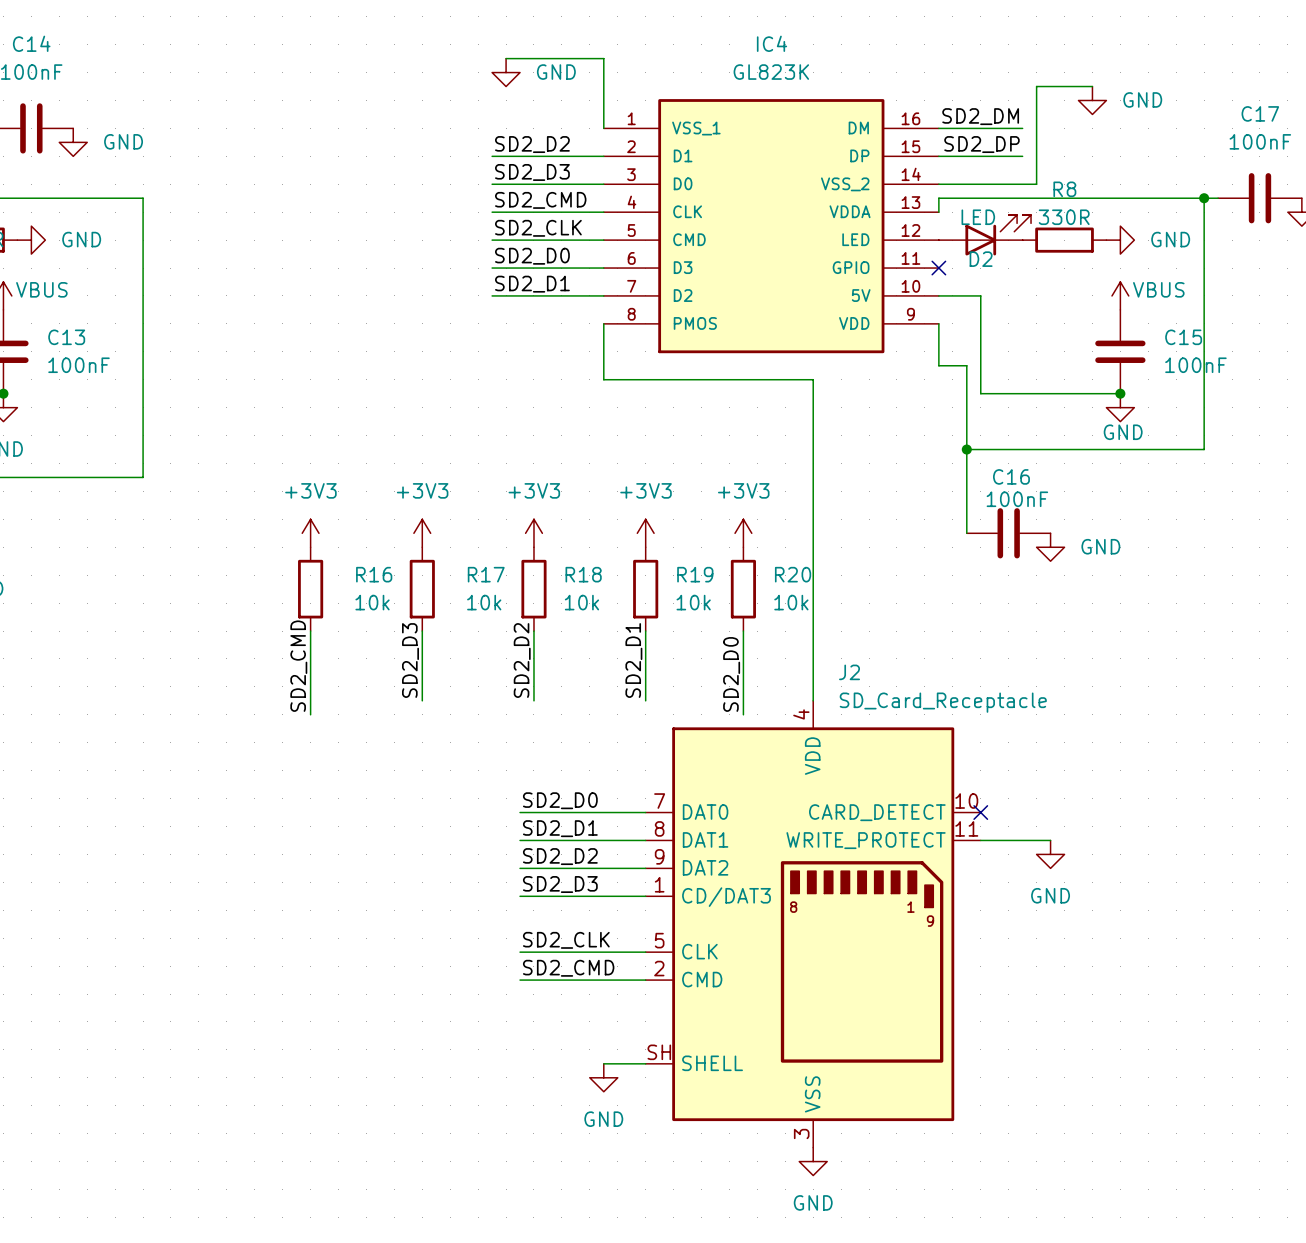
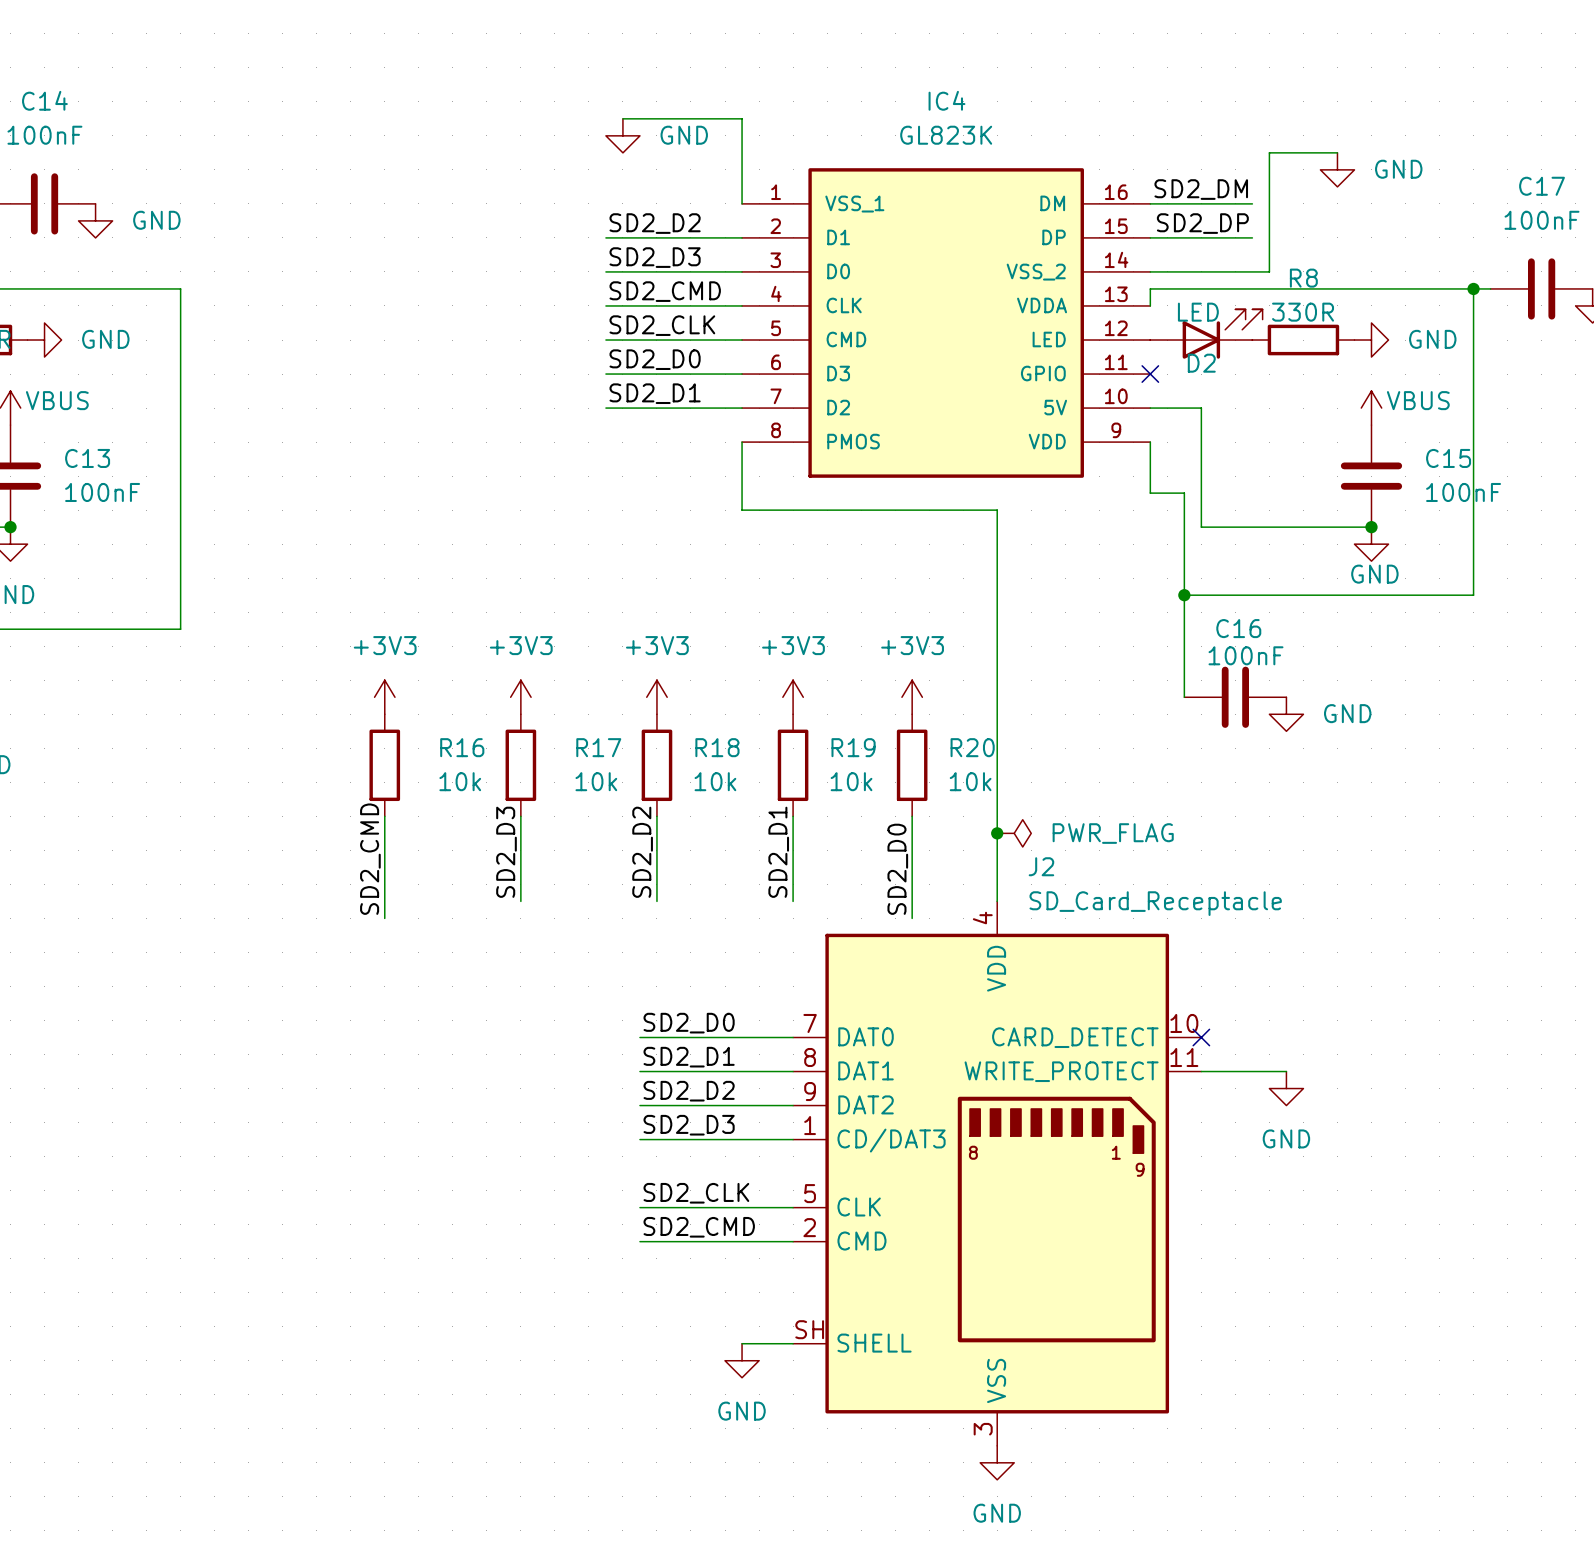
junction: none -> (997, 833)
power symbol: none -> PWR_FLAG (1014, 833)

